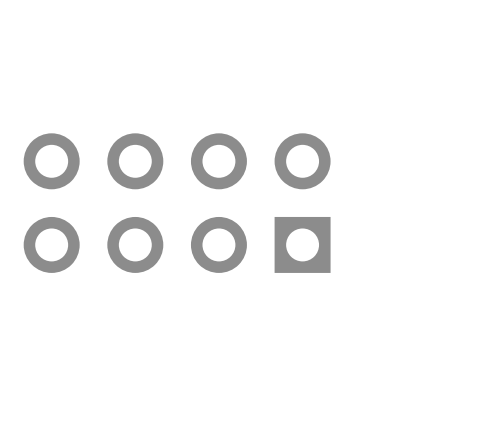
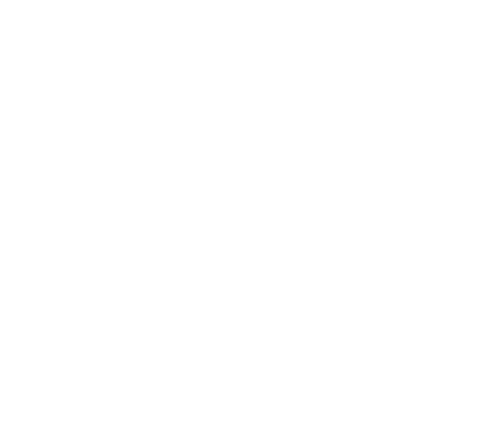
part: (177, 203) -> none

